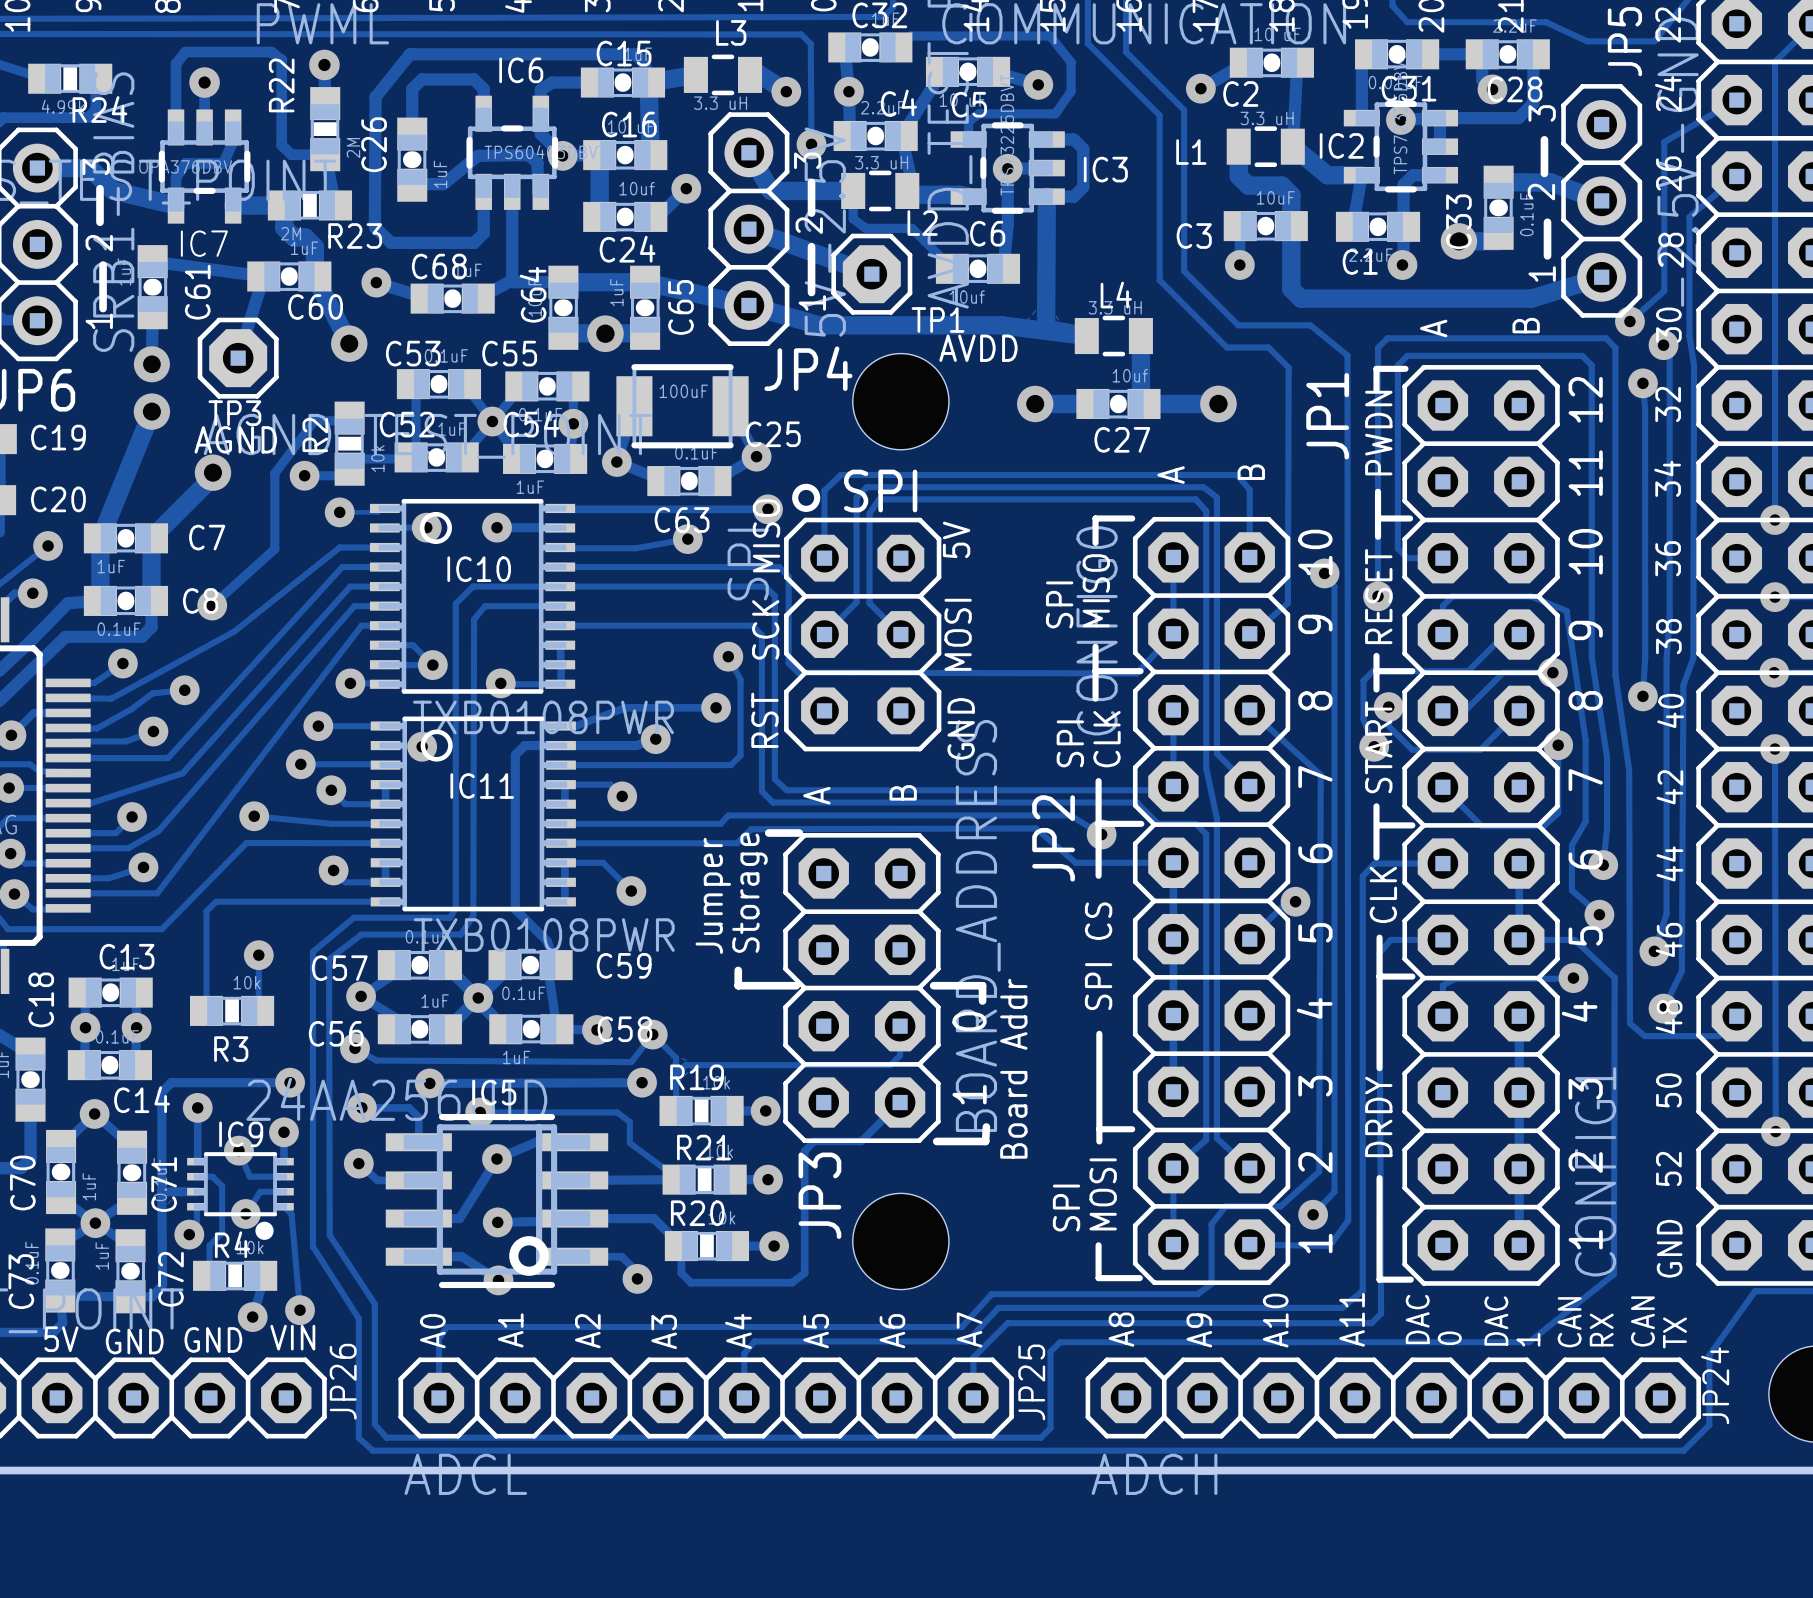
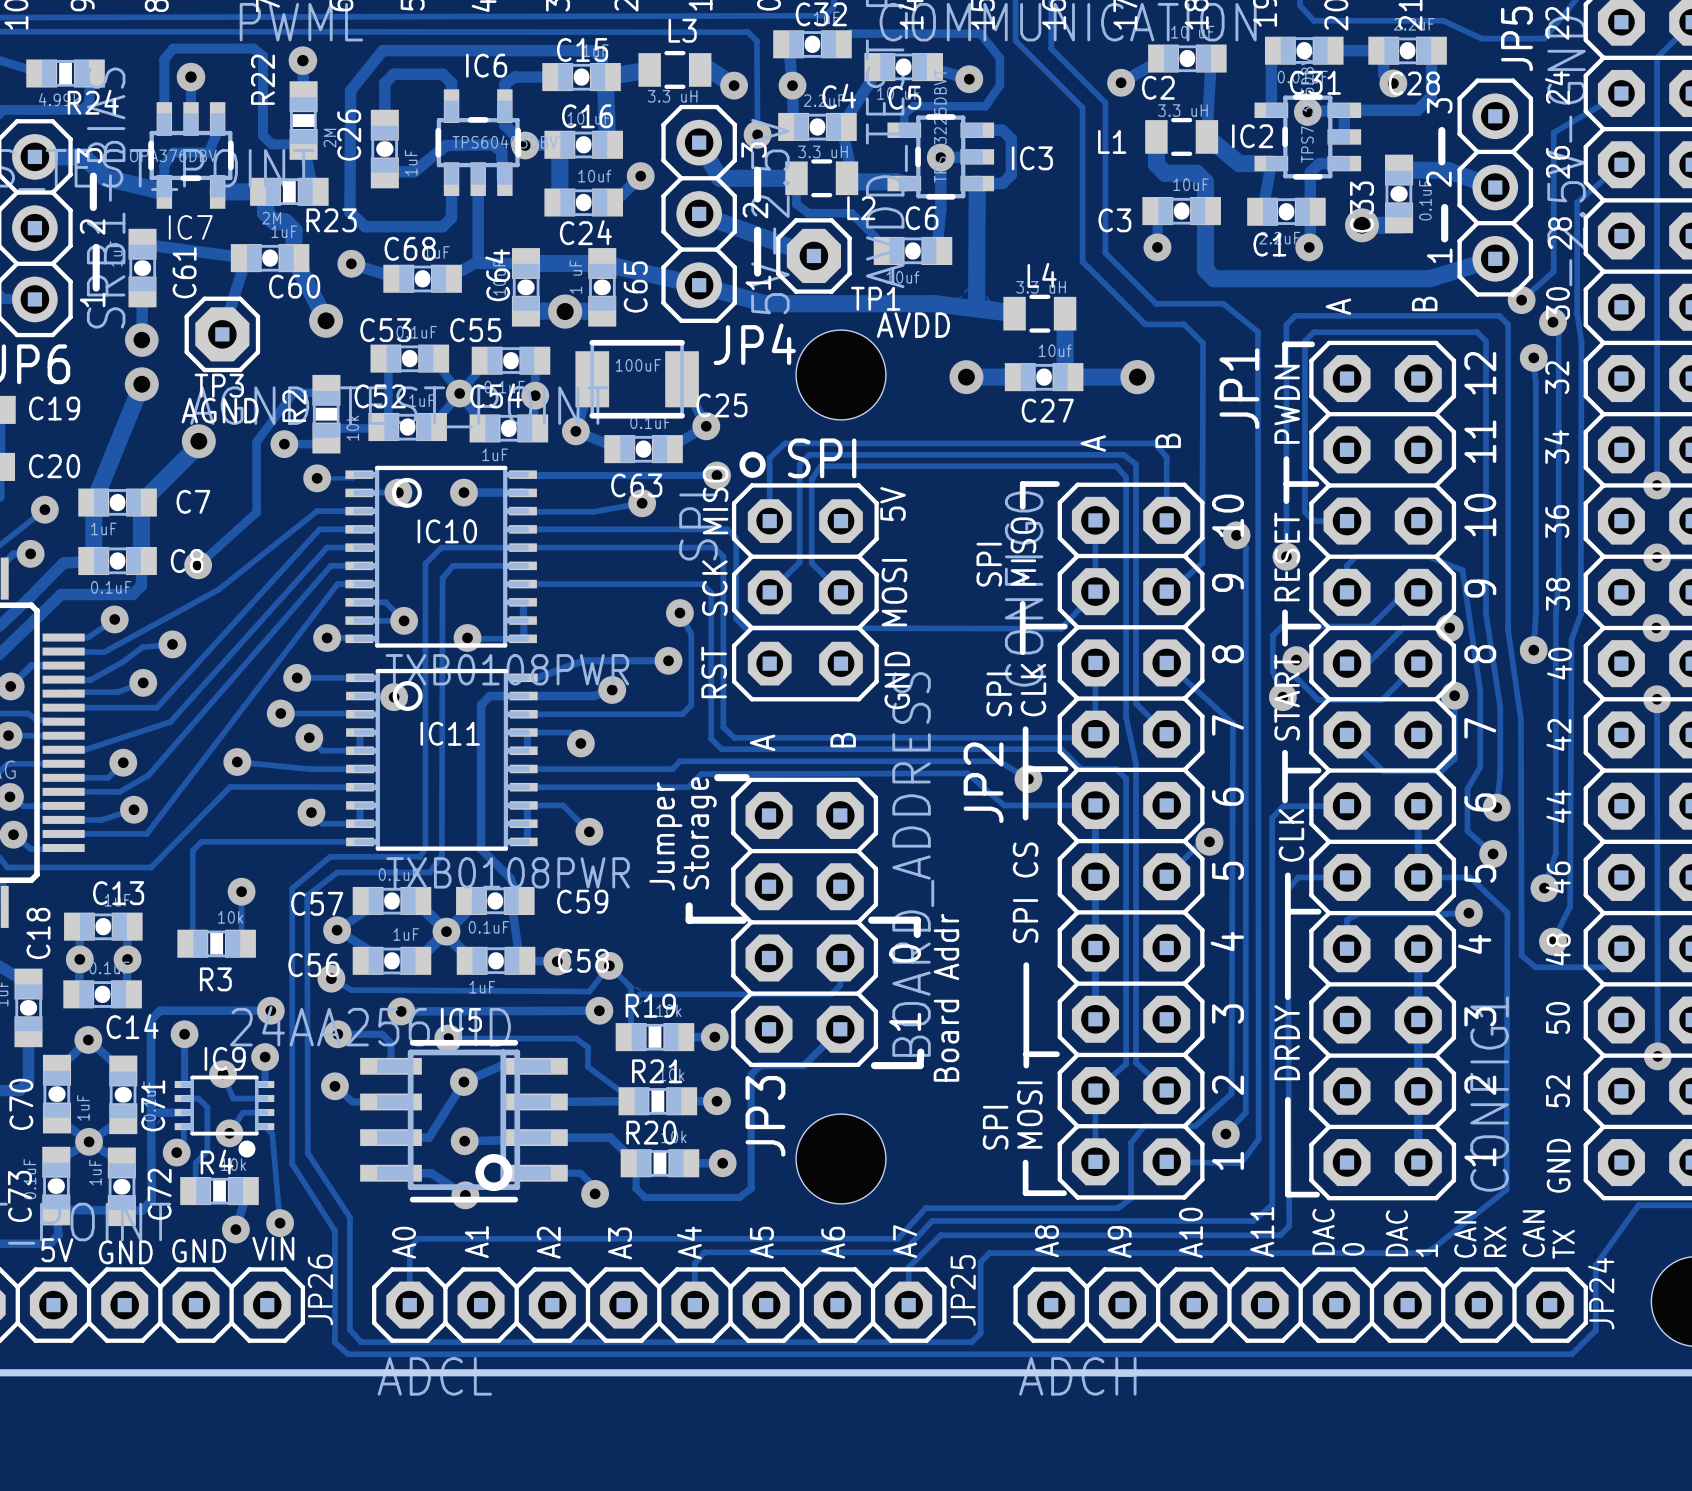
C65 value: 1uF (616, 292) -> 1 uF (575, 277)

